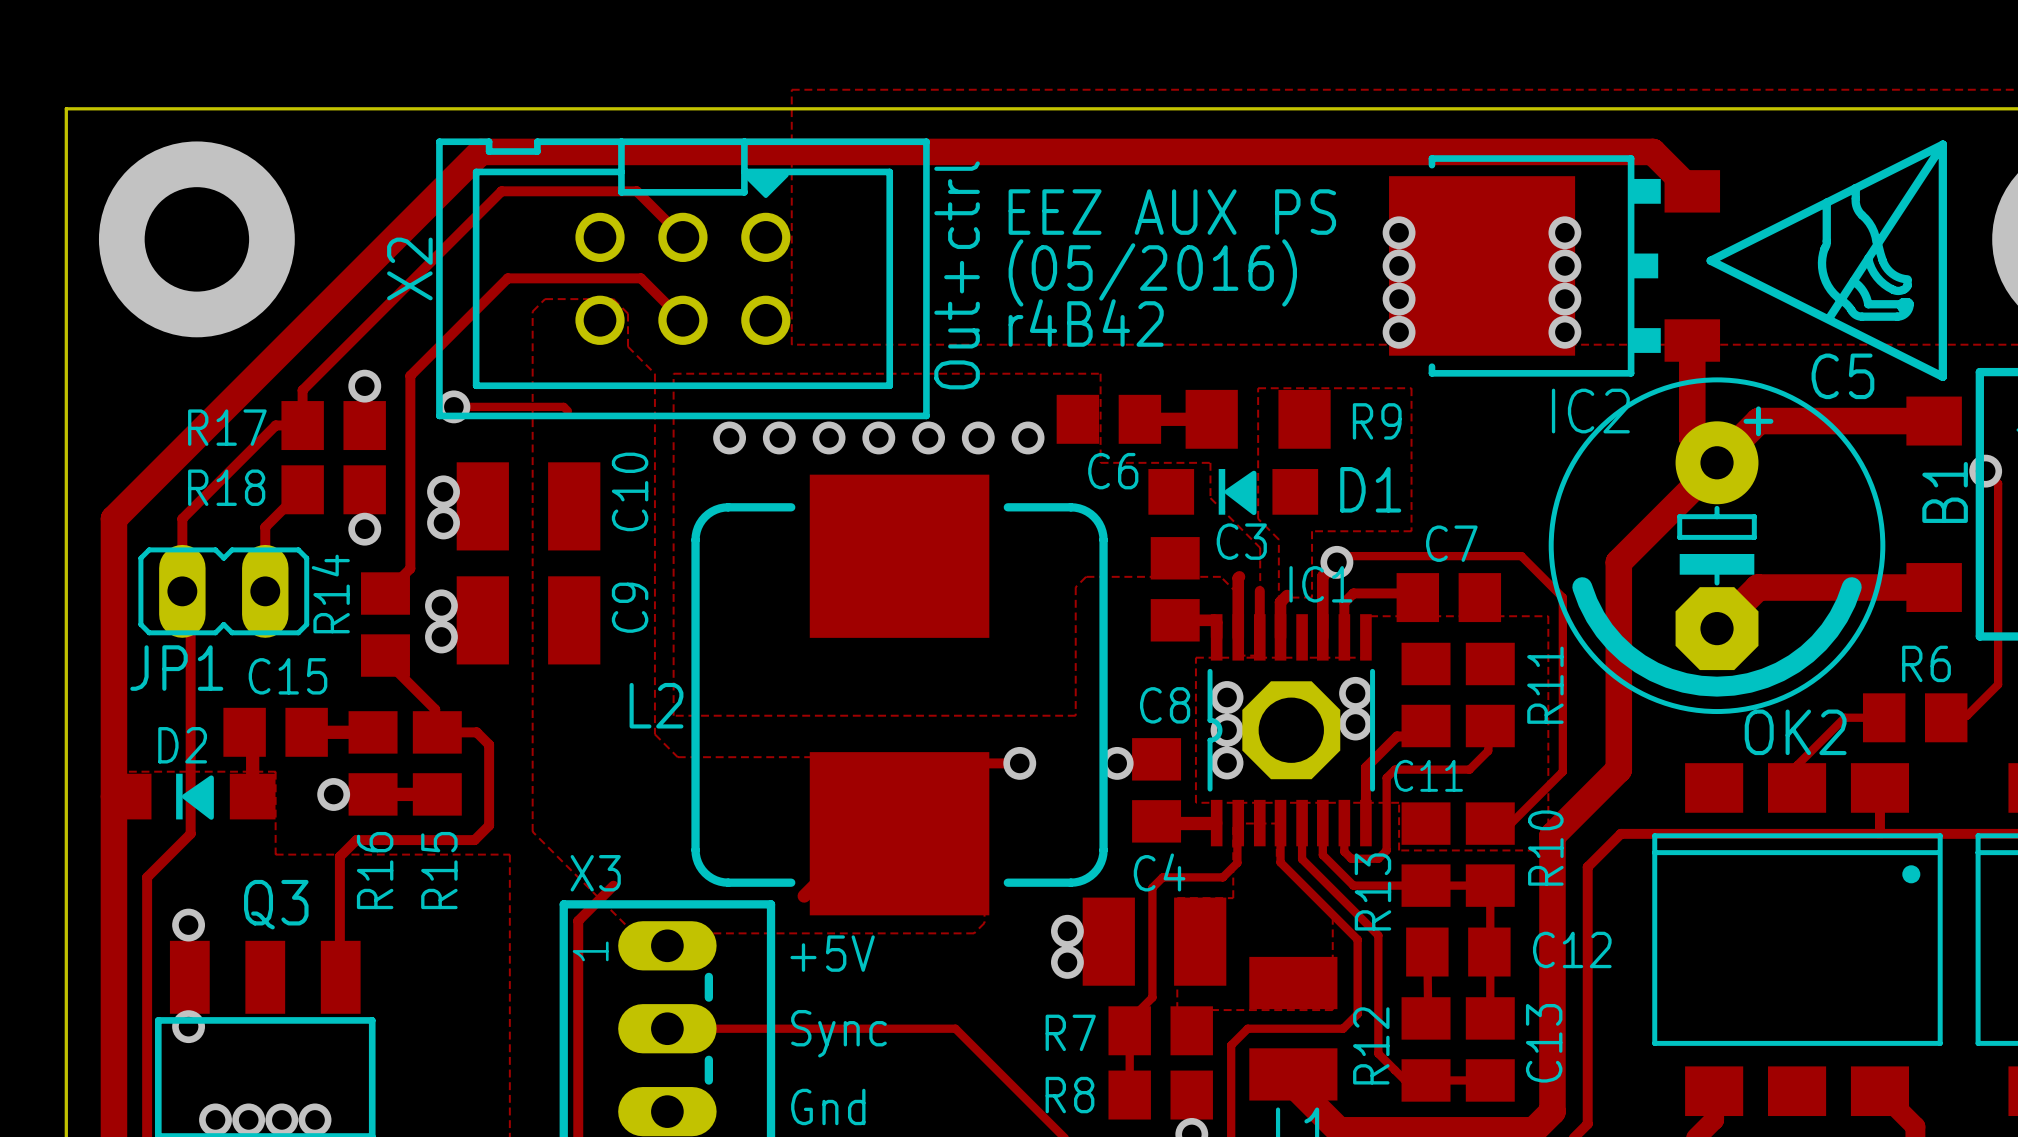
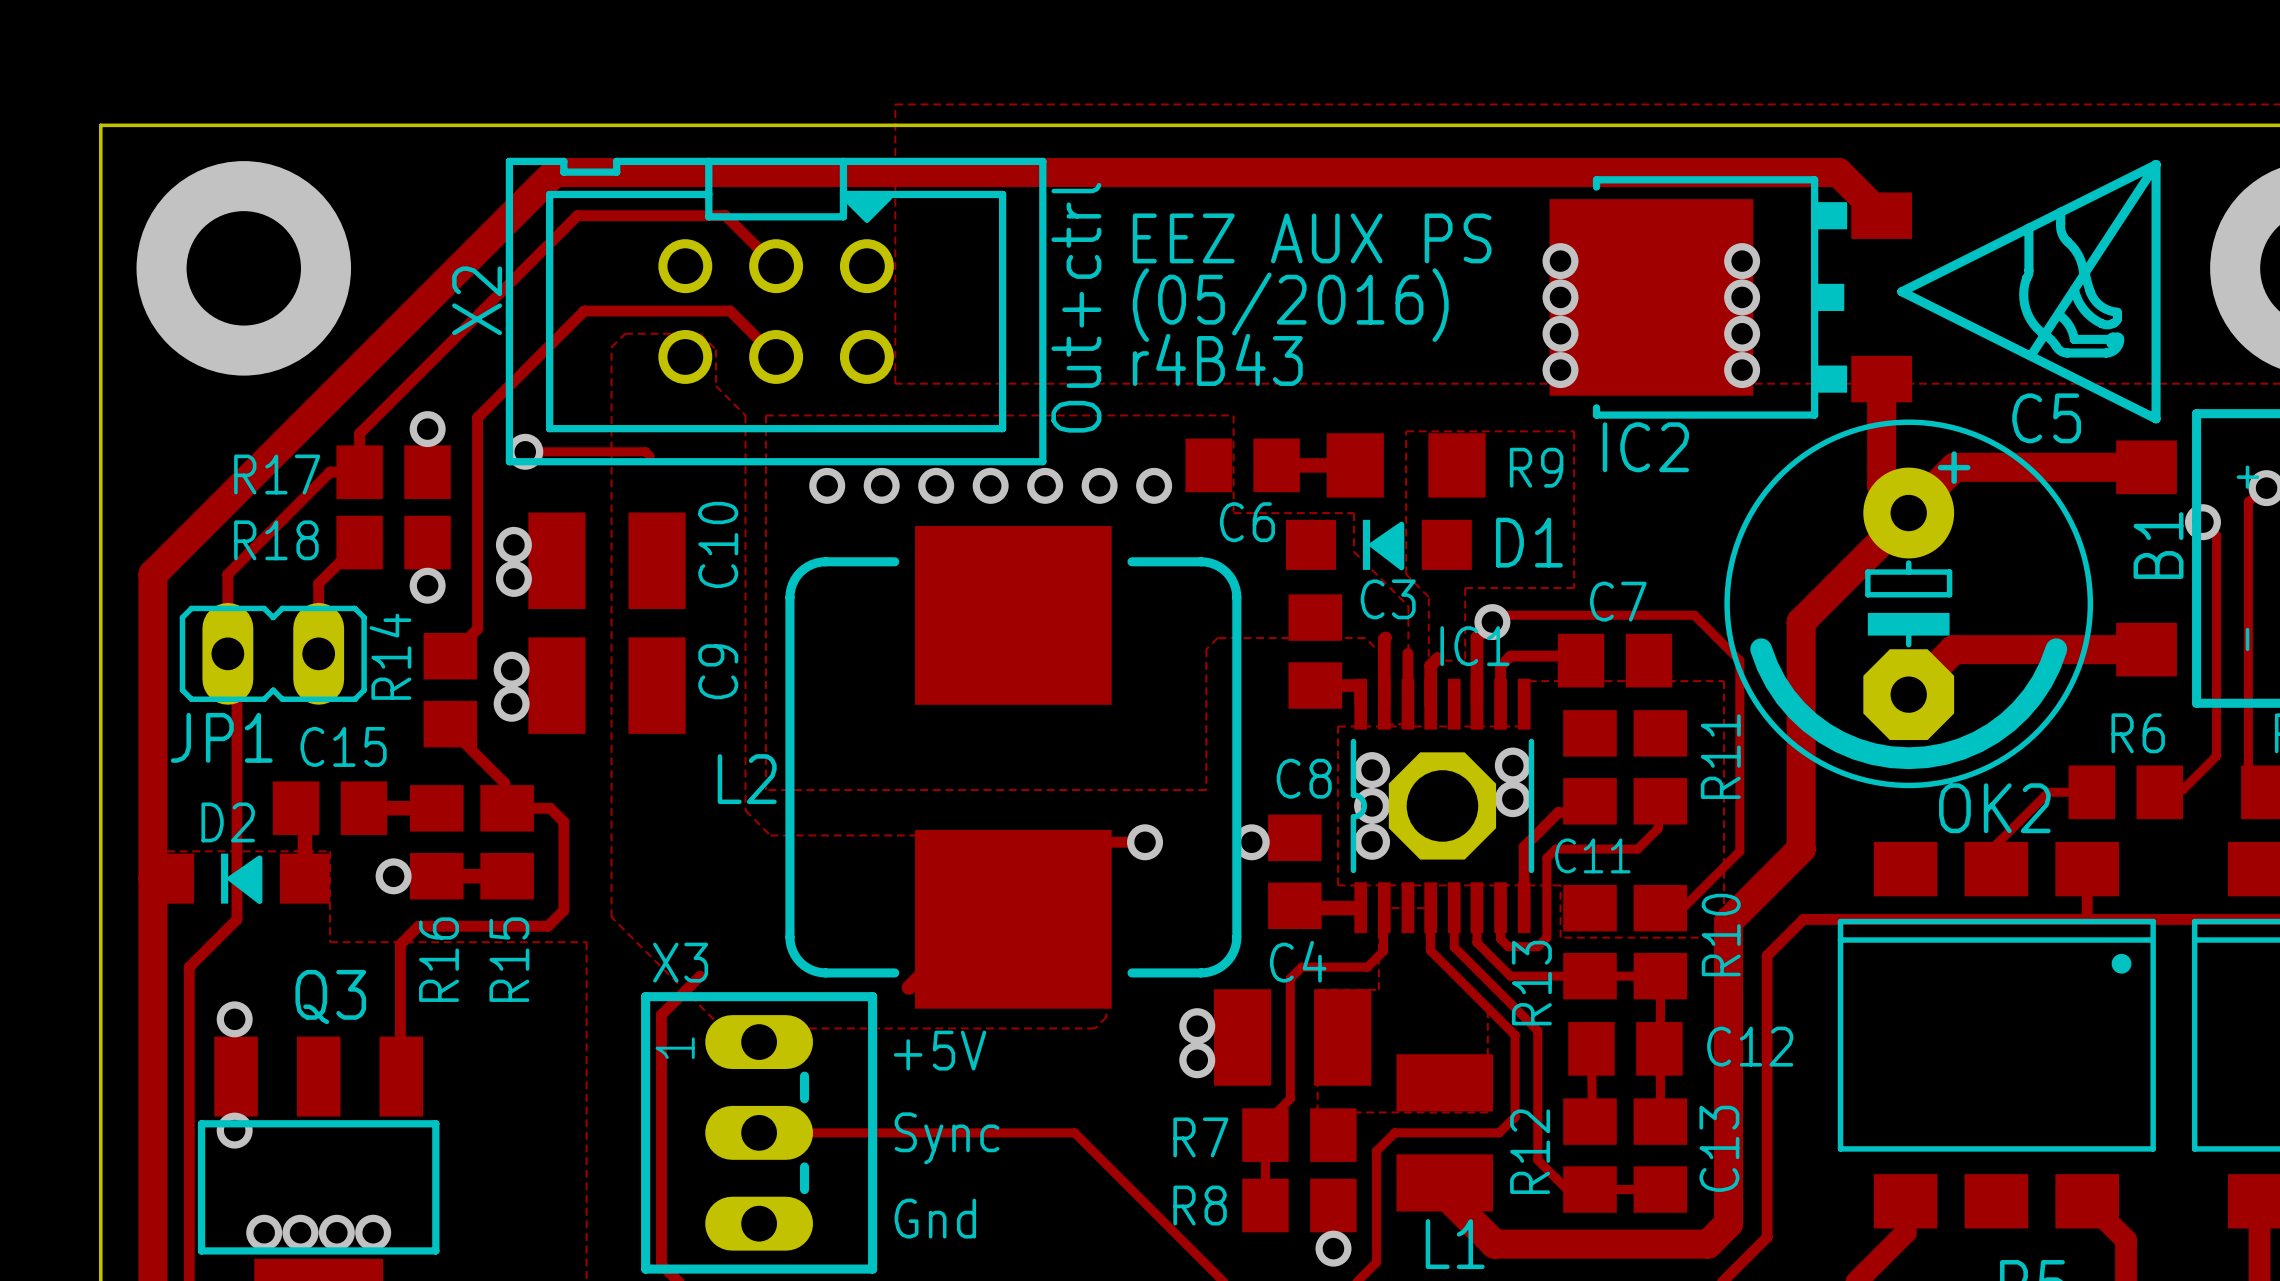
text: r4B42 (1086, 322) -> r4B43 (1217, 359)
IC2 name position: IC2 (1590, 411) -> IC2 (1645, 447)

